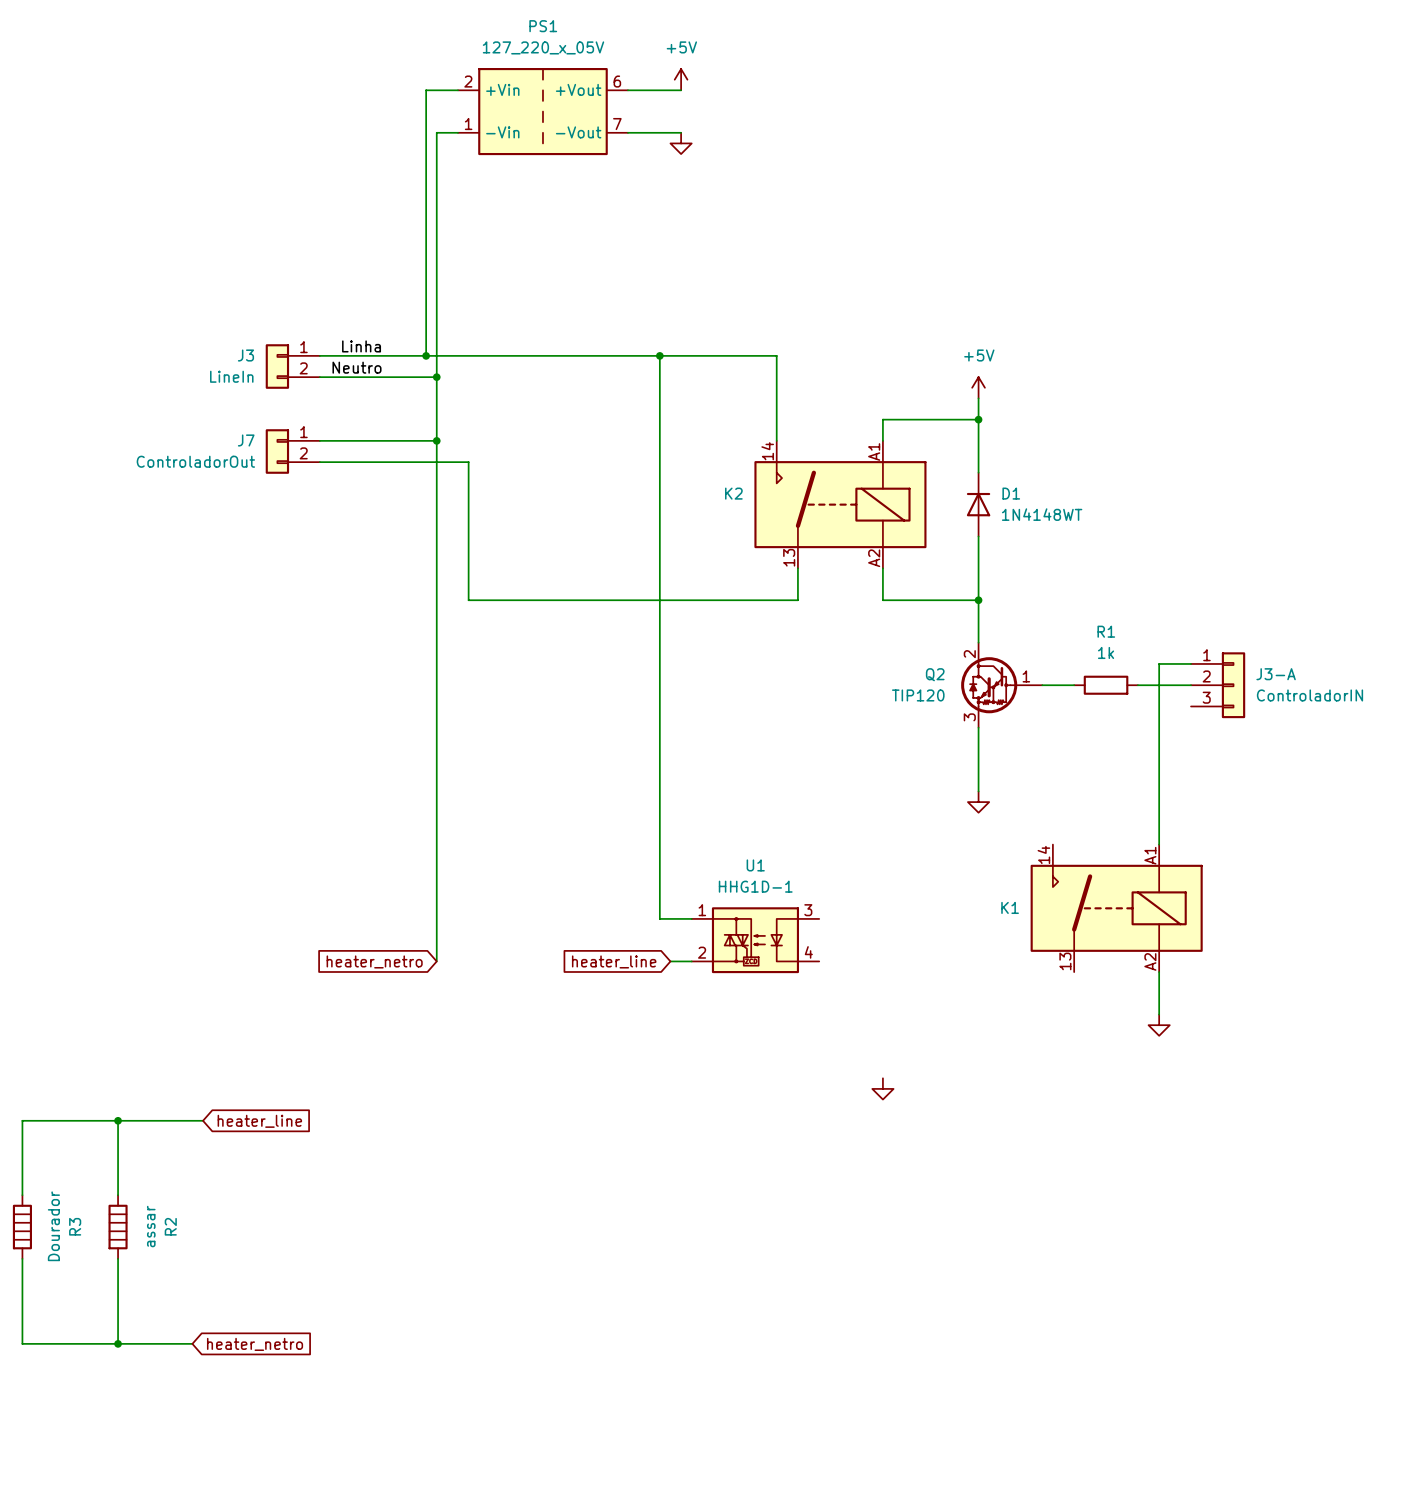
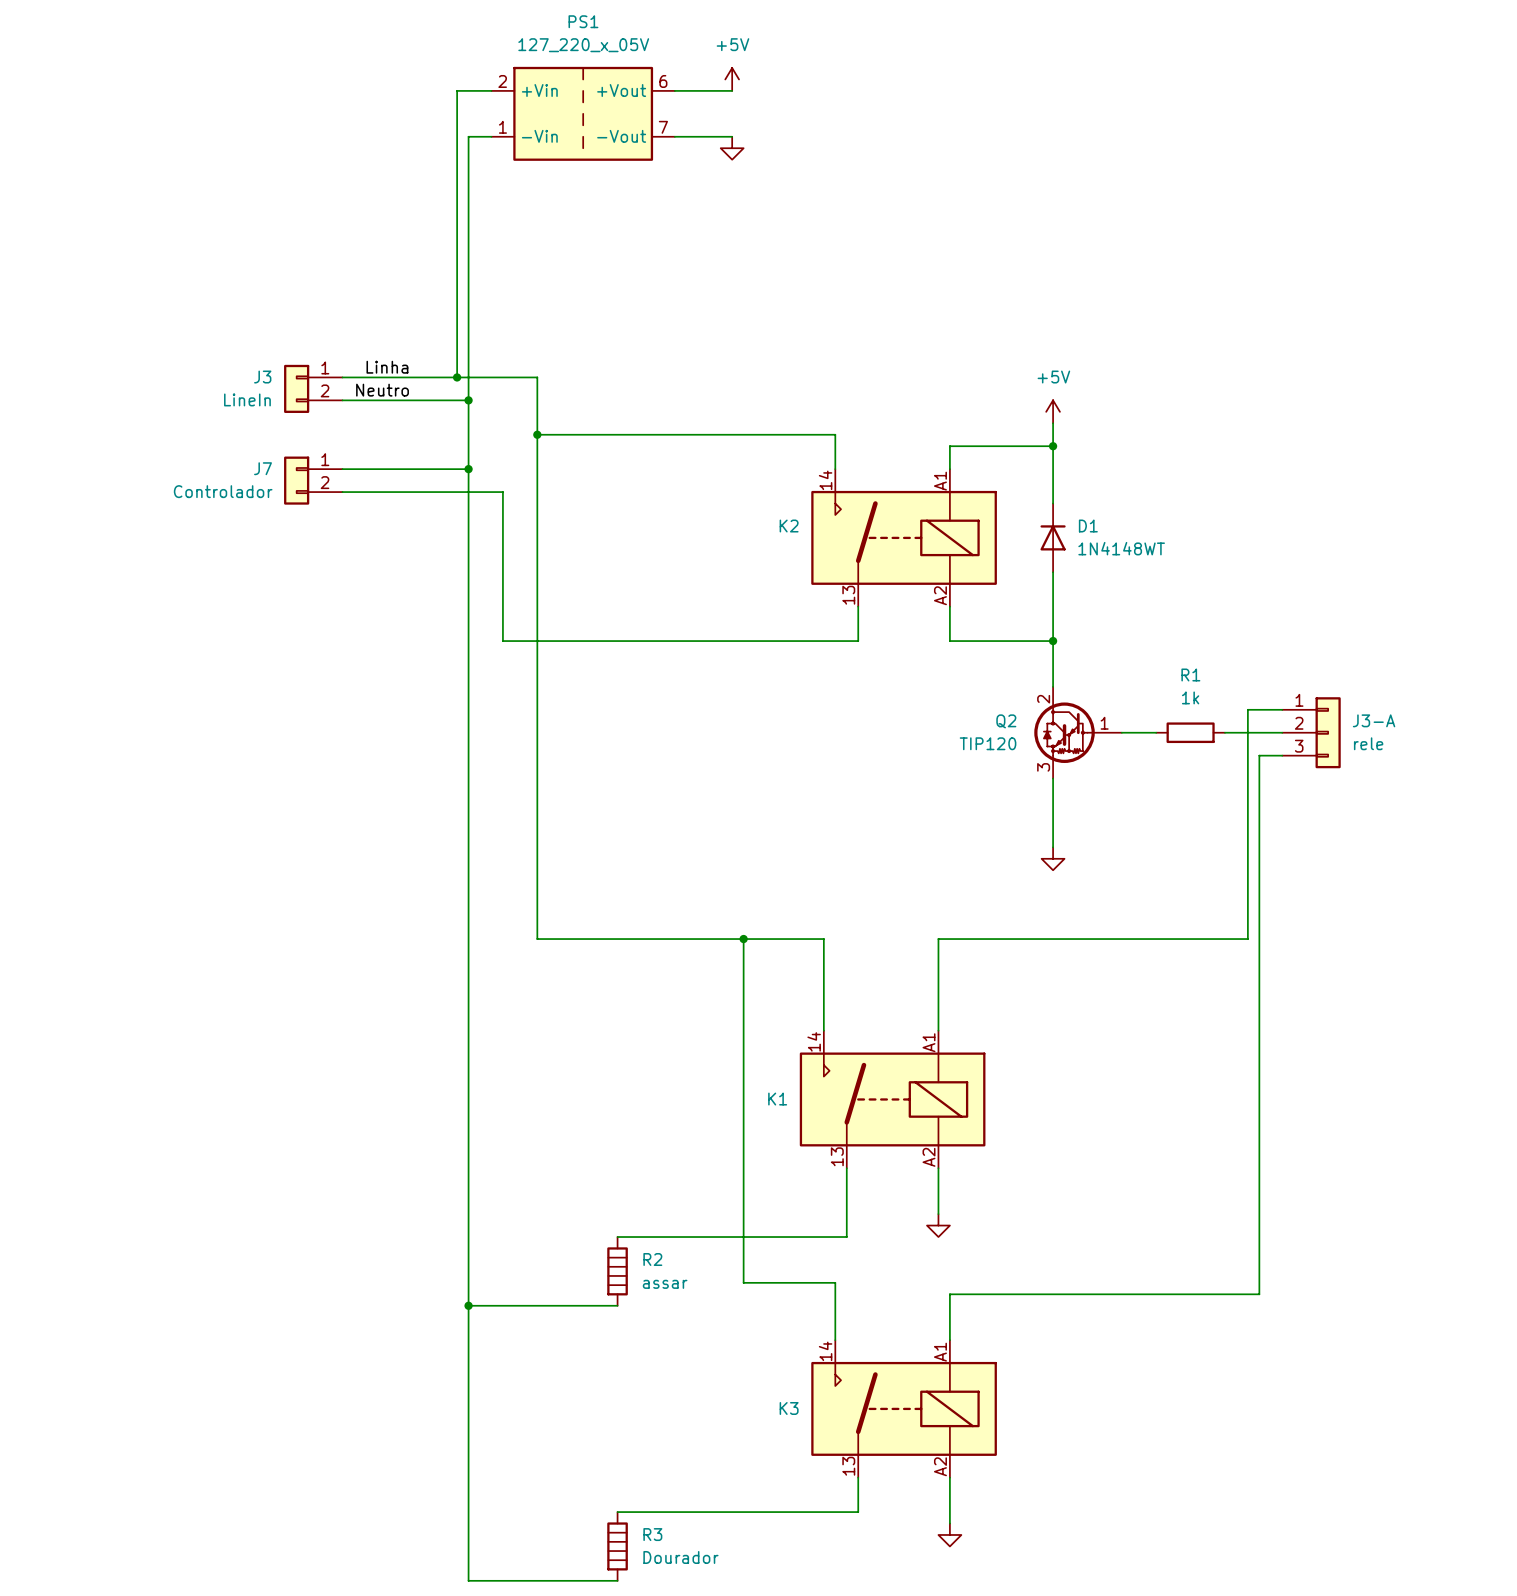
wire: (500, 355) (776, 355) (776, 409) -> (537, 434) (835, 434)
wire: none -> (537, 377) (537, 939) (823, 939) (823, 1030)
wire: (659, 355) (659, 918) (691, 918) -> none
junction: (659, 355) -> none
junction: none -> (537, 434)
J7 value: ControladorOut (195, 461) -> Controlador (223, 491)
J3-A value: ControladorIN (1309, 695) -> rele (1368, 743)
wire: none -> (1282, 755) (1259, 755) (1259, 1294) (949, 1294) (949, 1340)
wire: none -> (1247, 904) (1247, 939) (938, 939) (938, 1030)
wire: none -> (743, 939) (743, 1282) (835, 1282) (835, 1340)
junction: none -> (743, 939)
K1 position: (1116, 908) -> (892, 1099)
U1: HHG1D-1 (755, 940) -> none
global label: heater_netro (374, 961) -> none
wire: none -> (468, 1030) (468, 1580) (617, 1580)
global label: heater_line (614, 961) -> none
wire: (670, 961) (691, 961) -> none
wire: (1159, 972) (1159, 1014) -> none
power symbol: (1159, 1025) -> none
wire: none -> (846, 1168) (846, 1237) (617, 1237)
wire: none -> (938, 1168) (938, 1214)
power symbol position: (882, 1088) -> (938, 1225)
wire: (118, 1120) (118, 1195) -> none
junction: (118, 1120) -> none
wire: (203, 1120) (22, 1120) (22, 1195) -> none
global label: heater_line (259, 1121) -> none
wire: none -> (468, 1305) (617, 1305)
junction: none -> (468, 1305)
R3 value rotation: 0° (53, 1226) -> 90° clockwise (680, 1557)
R3 name rotation: 0° (75, 1226) -> 90° clockwise (652, 1534)
R2 value rotation: 0° (151, 1226) -> 90° clockwise (665, 1284)
R2 name rotation: 0° (170, 1226) -> 90° clockwise (652, 1259)
R3 position: (22, 1227) -> (617, 1546)
R2 position: (118, 1227) -> (617, 1271)
wire: (22, 1258) (22, 1343) (192, 1343) -> none
wire: (118, 1258) (118, 1343) -> none
K3: none -> (904, 1408)
junction: (118, 1343) -> none
global label: heater_netro (255, 1344) -> none
wire: none -> (858, 1477) (858, 1512) (617, 1512)
wire: none -> (949, 1477) (949, 1523)
power symbol: none -> (949, 1534)

